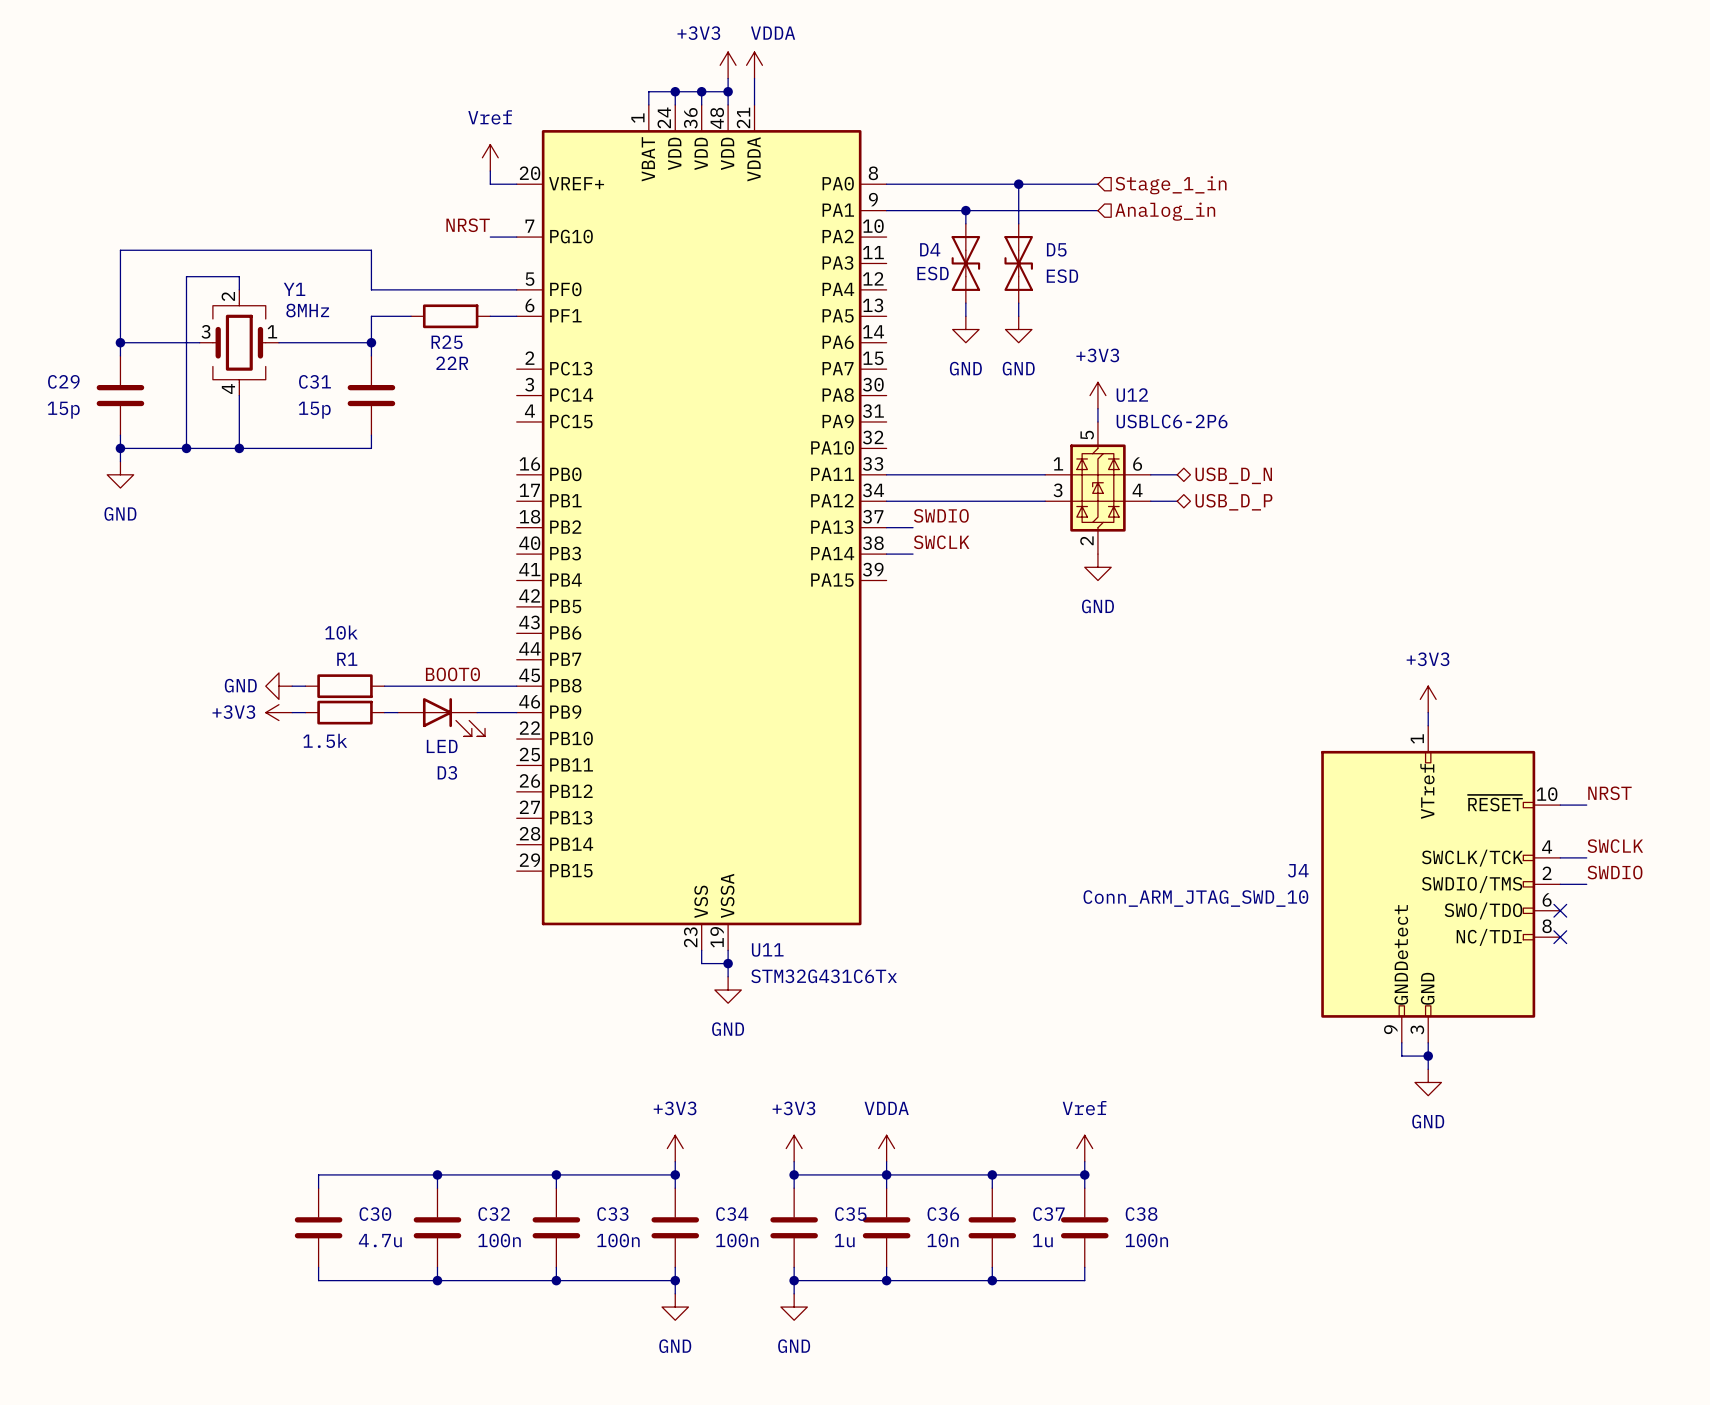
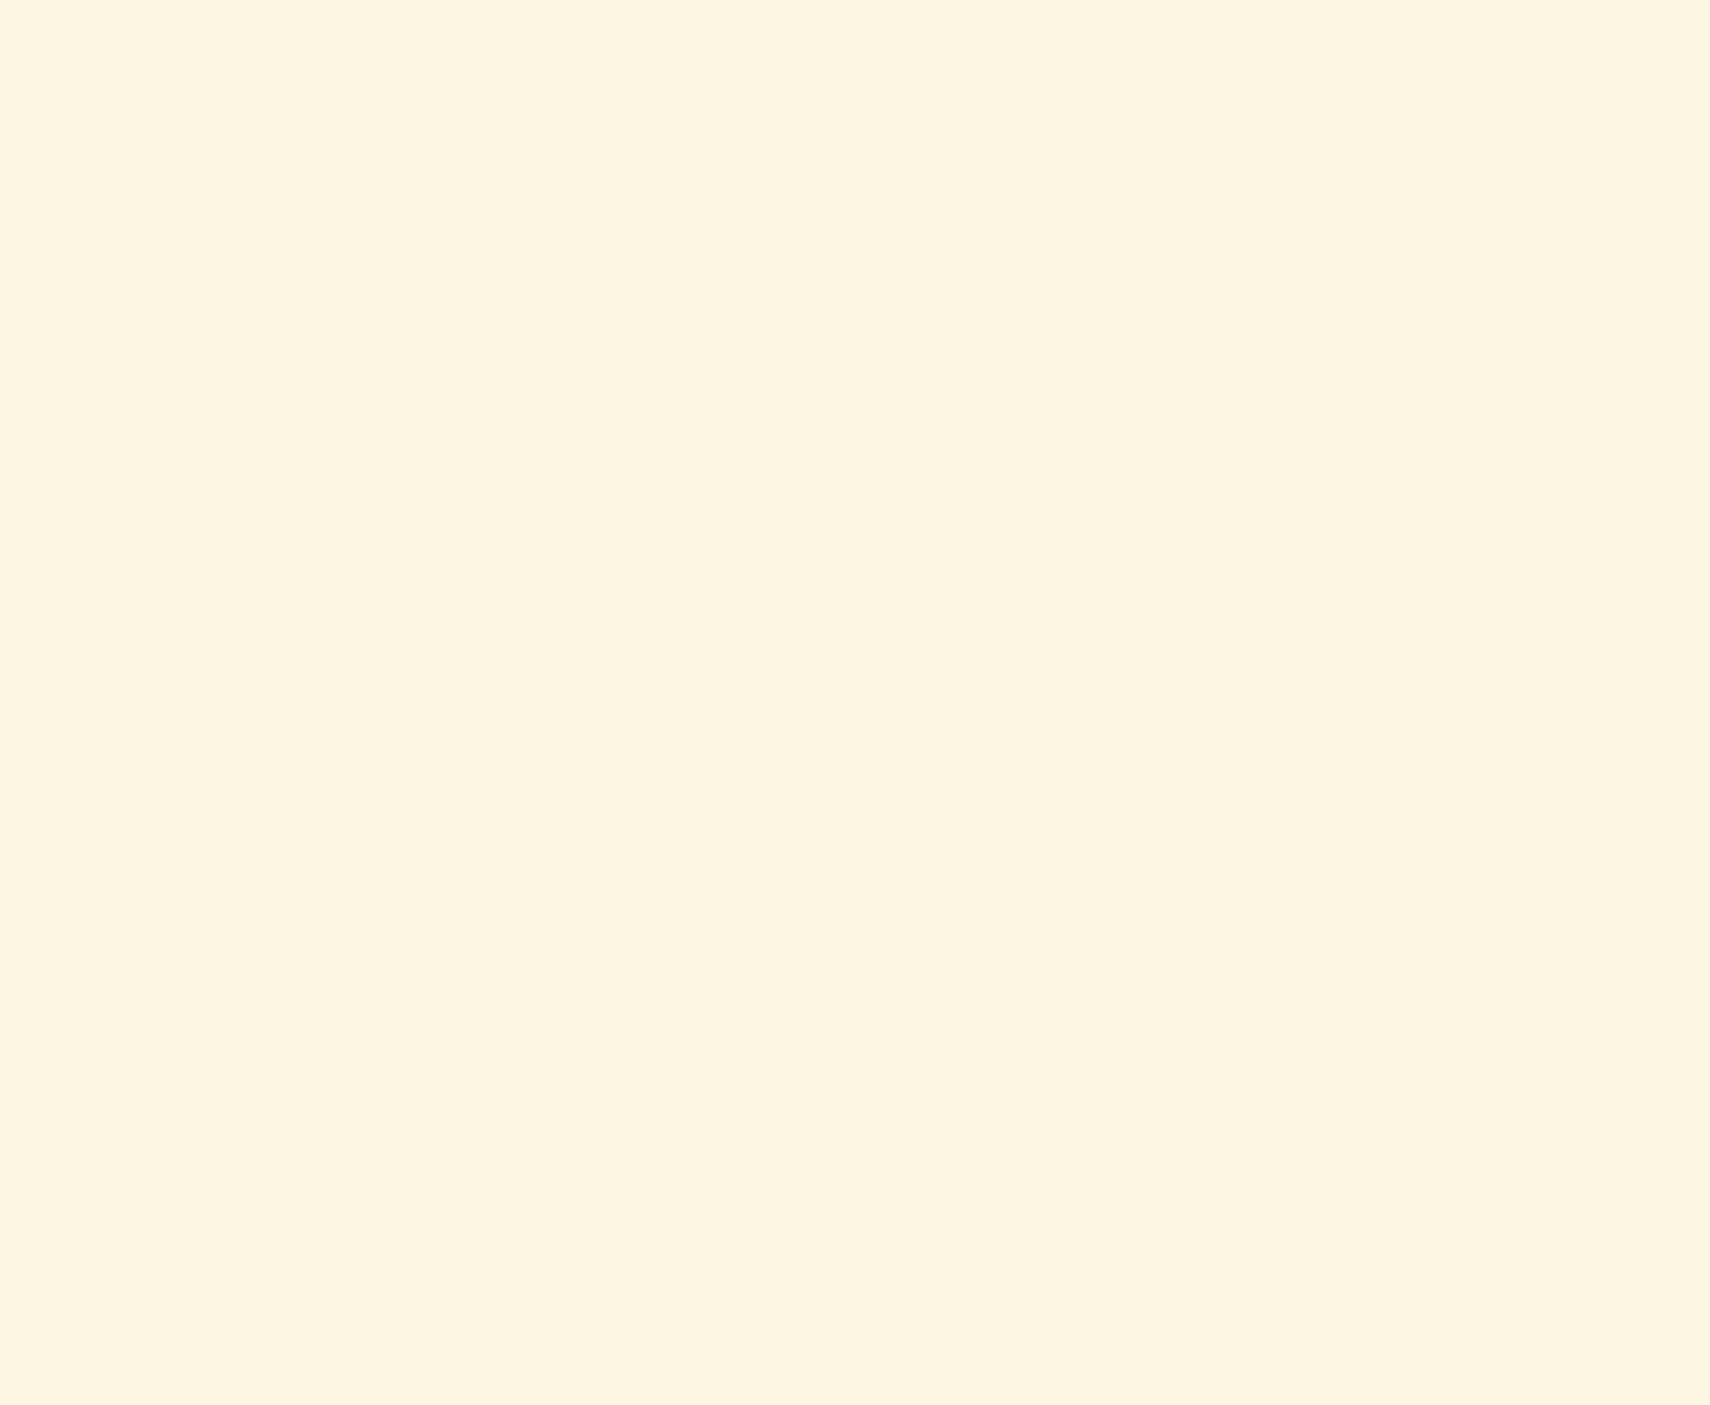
power symbol: +3V3 (728, 65) -> none
power symbol: VDDA (754, 65) -> none
wire: (728, 78) (728, 104) -> none
wire: (754, 78) (754, 104) -> none
wire: (675, 91) (675, 104) -> none
junction: (675, 91) -> none
wire: (701, 91) (701, 104) -> none
junction: (701, 91) -> none
wire: (728, 91) (648, 91) (648, 104) -> none
junction: (728, 91) -> none
power symbol: Vref (490, 157) -> none
wire: (490, 171) (490, 184) (516, 184) -> none
wire: (886, 184) (1097, 184) -> none
wire: (1018, 184) (1018, 223) -> none
junction: (1018, 184) -> none
hierarchical label: Stage_1_in (1171, 185) -> none
wire: (886, 210) (1097, 210) -> none
wire: (965, 210) (965, 223) -> none
junction: (965, 210) -> none
hierarchical label: Analog_in (1165, 211) -> none
label: NRST (468, 225) -> none
wire: (490, 237) (516, 237) -> none
D4: ESD (965, 263) -> none
D5: ESD (1018, 263) -> none
wire: (239, 289) (239, 276) (186, 276) (186, 448) -> none
wire: (516, 289) (371, 289) (371, 250) (120, 250) (120, 355) -> none
wire: (965, 303) (965, 316) -> none
wire: (1018, 303) (1018, 316) -> none
wire: (411, 316) (371, 316) (371, 355) -> none
R25: 22R (450, 316) -> none
wire: (490, 316) (516, 316) -> none
power symbol: GND (965, 329) -> none
power symbol: GND (1018, 329) -> none
wire: (120, 342) (199, 342) -> none
junction: (120, 342) -> none
Y1: 8MHz (239, 342) -> none
wire: (278, 342) (371, 342) -> none
junction: (371, 342) -> none
C29: 15p (120, 395) -> none
wire: (239, 395) (239, 448) -> none
C31: 15p (371, 395) -> none
power symbol: +3V3 (1097, 395) -> none
wire: (1097, 408) (1097, 421) -> none
wire: (120, 435) (120, 461) -> none
wire: (371, 435) (371, 448) (120, 448) -> none
junction: (120, 448) -> none
junction: (186, 448) -> none
junction: (239, 448) -> none
power symbol: GND (120, 474) -> none
wire: (886, 474) (1045, 474) -> none
wire: (1150, 474) (1177, 474) -> none
hierarchical label: USB_D_N (1233, 475) -> none
U12: USBLC6-2P6 (1097, 488) -> none
wire: (886, 501) (1045, 501) -> none
wire: (1150, 501) (1177, 501) -> none
hierarchical label: USB_D_P (1233, 502) -> none
label: SWDIO (941, 515) -> none
U11: STM32G431C6Tx (701, 527) -> none
wire: (886, 527) (913, 527) -> none
label: SWCLK (941, 542) -> none
wire: (886, 554) (913, 554) -> none
power symbol: GND (1097, 567) -> none
label: BOOT0 (452, 674) -> none
power symbol: GND (278, 686) -> none
wire: (292, 686) (305, 686) -> none
R1: 10k (345, 686) -> none
wire: (384, 686) (516, 686) -> none
power symbol: +3V3 (1428, 699) -> none
power symbol: +3V3 (278, 712) -> none
wire: (292, 712) (305, 712) -> none
part: 1.5k (345, 712) -> none
wire: (384, 712) (397, 712) -> none
wire: (477, 712) (516, 712) -> none
wire: (1428, 712) (1428, 725) -> none
D3: LED (441, 717) -> none
label: NRST (1609, 793) -> none
wire: (1560, 805) (1586, 805) -> none
label: SWCLK (1615, 846) -> none
wire: (1560, 857) (1586, 857) -> none
label: SWDIO (1615, 872) -> none
J4: Conn_ARM_JTAG_SWD_10 (1440, 884) -> none
wire: (1560, 884) (1586, 884) -> none
no-connect mark: (1560, 910) -> none
no-connect mark: (1560, 937) -> none
wire: (701, 950) (701, 963) (728, 963) -> none
wire: (728, 950) (728, 976) -> none
junction: (728, 963) -> none
power symbol: GND (728, 990) -> none
wire: (1401, 1042) (1401, 1056) (1428, 1056) -> none
wire: (1428, 1042) (1428, 1069) -> none
junction: (1428, 1056) -> none
power symbol: GND (1428, 1082) -> none
power symbol: +3V3 (675, 1148) -> none
power symbol: +3V3 (794, 1148) -> none
power symbol: VDDA (886, 1148) -> none
power symbol: Vref (1084, 1148) -> none
wire: (675, 1161) (675, 1188) -> none
wire: (794, 1161) (794, 1188) -> none
wire: (886, 1161) (886, 1188) -> none
wire: (1084, 1161) (1084, 1188) -> none
wire: (437, 1174) (437, 1188) -> none
junction: (437, 1174) -> none
wire: (556, 1174) (556, 1188) -> none
junction: (556, 1174) -> none
wire: (675, 1174) (318, 1174) (318, 1188) -> none
junction: (675, 1174) -> none
wire: (794, 1174) (1084, 1174) -> none
junction: (794, 1174) -> none
junction: (886, 1174) -> none
wire: (992, 1174) (992, 1188) -> none
junction: (992, 1174) -> none
junction: (1084, 1174) -> none
C30: 4.7u (318, 1227) -> none
C32: 100n (437, 1227) -> none
C33: 100n (556, 1227) -> none
C34: 100n (675, 1227) -> none
C35: 1u (794, 1227) -> none
C36: 10n (886, 1227) -> none
C37: 1u (992, 1227) -> none
C38: 100n (1084, 1227) -> none
wire: (318, 1267) (318, 1280) (675, 1280) -> none
wire: (437, 1267) (437, 1280) -> none
wire: (556, 1267) (556, 1280) -> none
wire: (675, 1267) (675, 1293) -> none
wire: (794, 1267) (794, 1293) -> none
wire: (886, 1267) (886, 1280) -> none
wire: (992, 1267) (992, 1280) -> none
wire: (1084, 1267) (1084, 1280) (794, 1280) -> none
junction: (437, 1280) -> none
junction: (556, 1280) -> none
junction: (675, 1280) -> none
junction: (794, 1280) -> none
junction: (886, 1280) -> none
junction: (992, 1280) -> none
power symbol: GND (675, 1307) -> none
power symbol: GND (794, 1307) -> none

